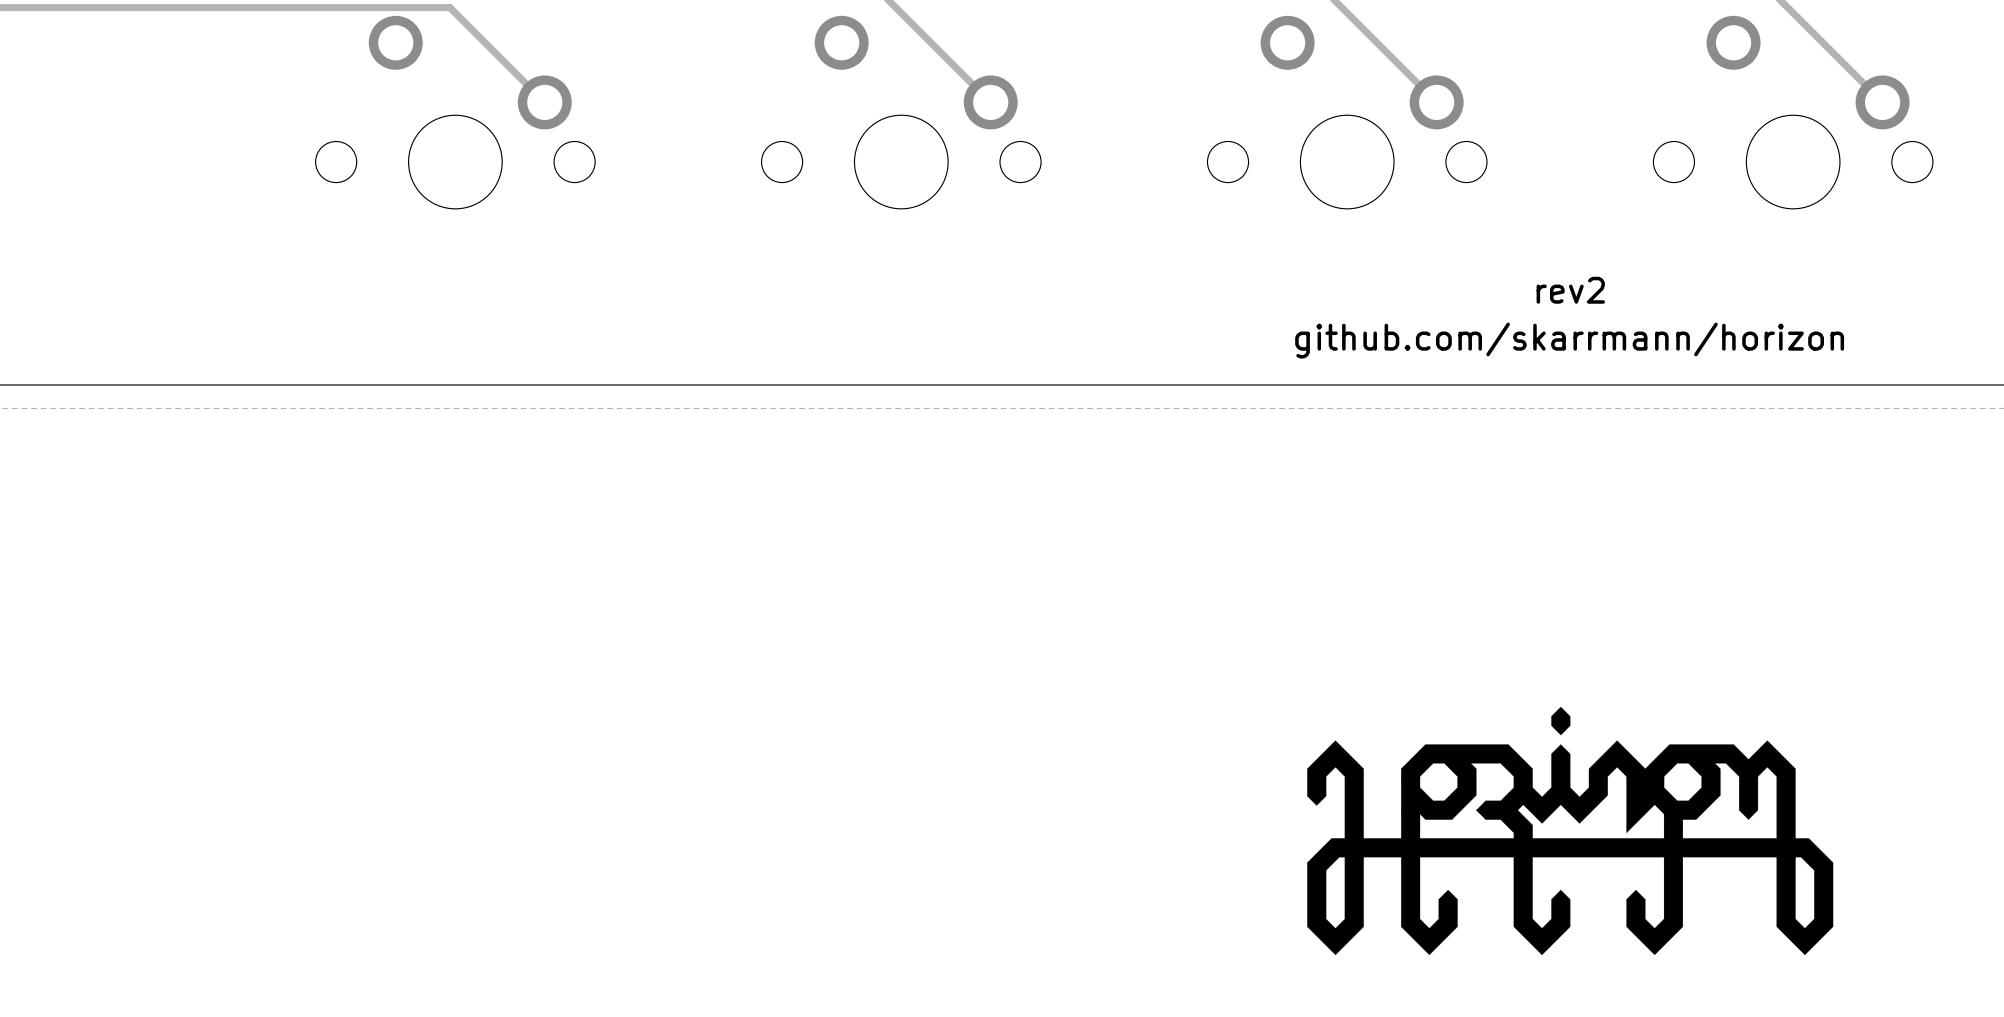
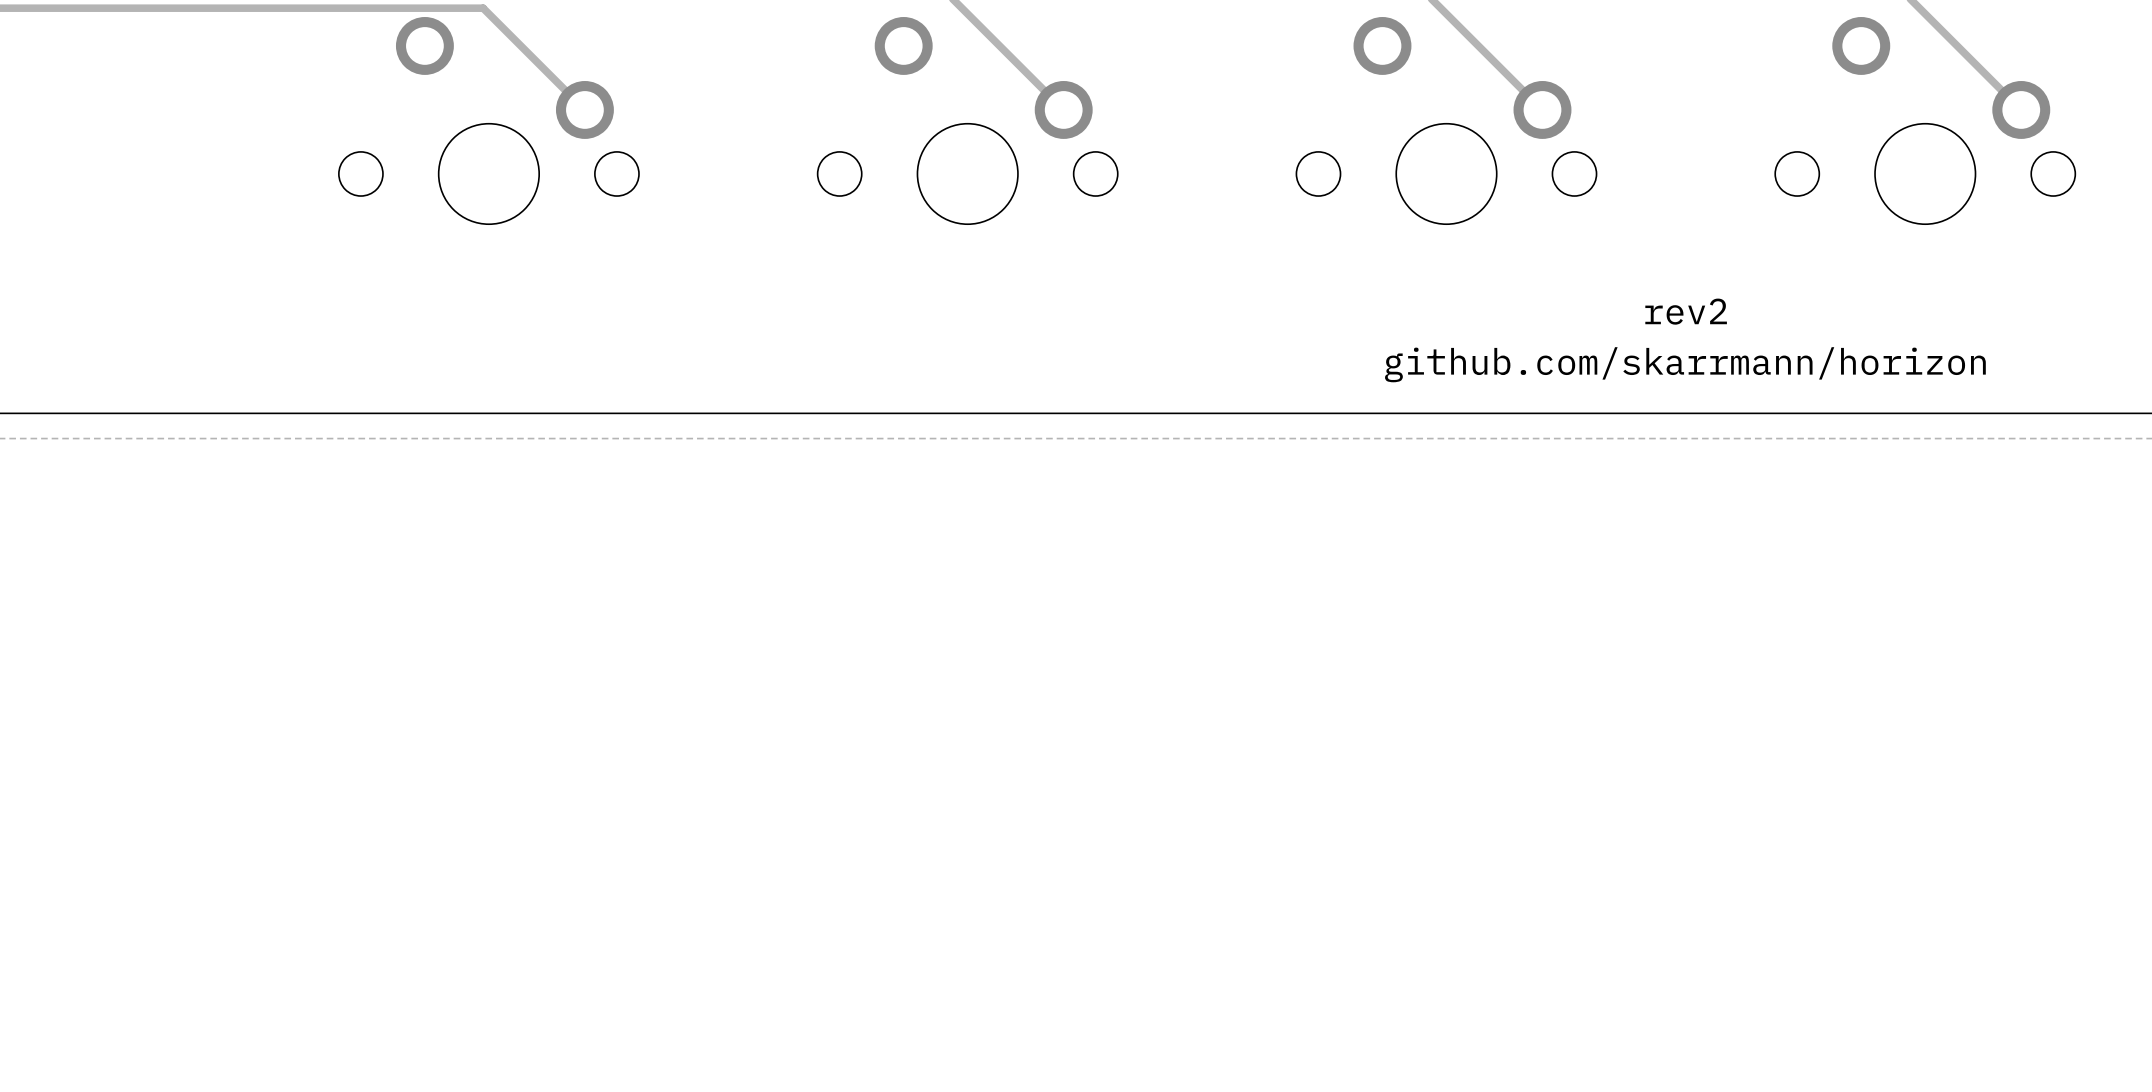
drawing: [1307, 706, 1834, 956] -> none

